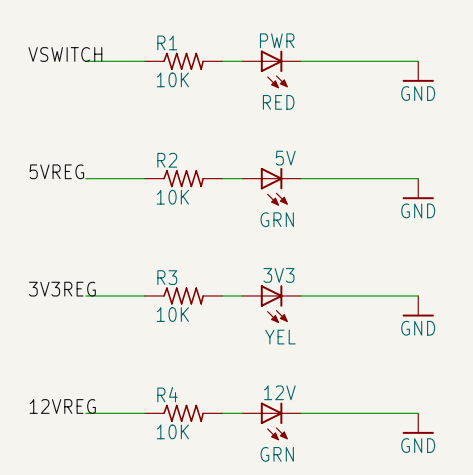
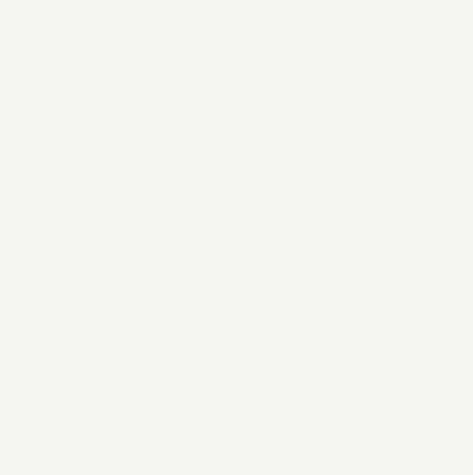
label: VSWITCH (65, 54) -> none
wire: (85, 61) (144, 61) -> none
R1: 10K (183, 61) -> none
wire: (222, 61) (242, 61) -> none
wire: (300, 61) (418, 61) -> none
PWR: RED (271, 69) -> none
power symbol: GND (418, 71) -> none
label: 5VREG (56, 171) -> none
wire: (85, 178) (144, 178) -> none
R2: 10K (183, 178) -> none
wire: (222, 178) (242, 178) -> none
wire: (300, 178) (418, 178) -> none
5V: GRN (271, 186) -> none
power symbol: GND (418, 188) -> none
label: 3V3REG (62, 289) -> none
wire: (85, 295) (144, 295) -> none
R3: 10K (183, 295) -> none
wire: (222, 295) (242, 295) -> none
wire: (300, 295) (418, 295) -> none
3V3: YEL (271, 304) -> none
power symbol: GND (418, 306) -> none
label: 12VREG (62, 406) -> none
wire: (85, 413) (144, 413) -> none
R4: 10K (183, 413) -> none
wire: (222, 413) (242, 413) -> none
wire: (300, 413) (418, 413) -> none
12V: GRN (271, 421) -> none
power symbol: GND (418, 423) -> none

